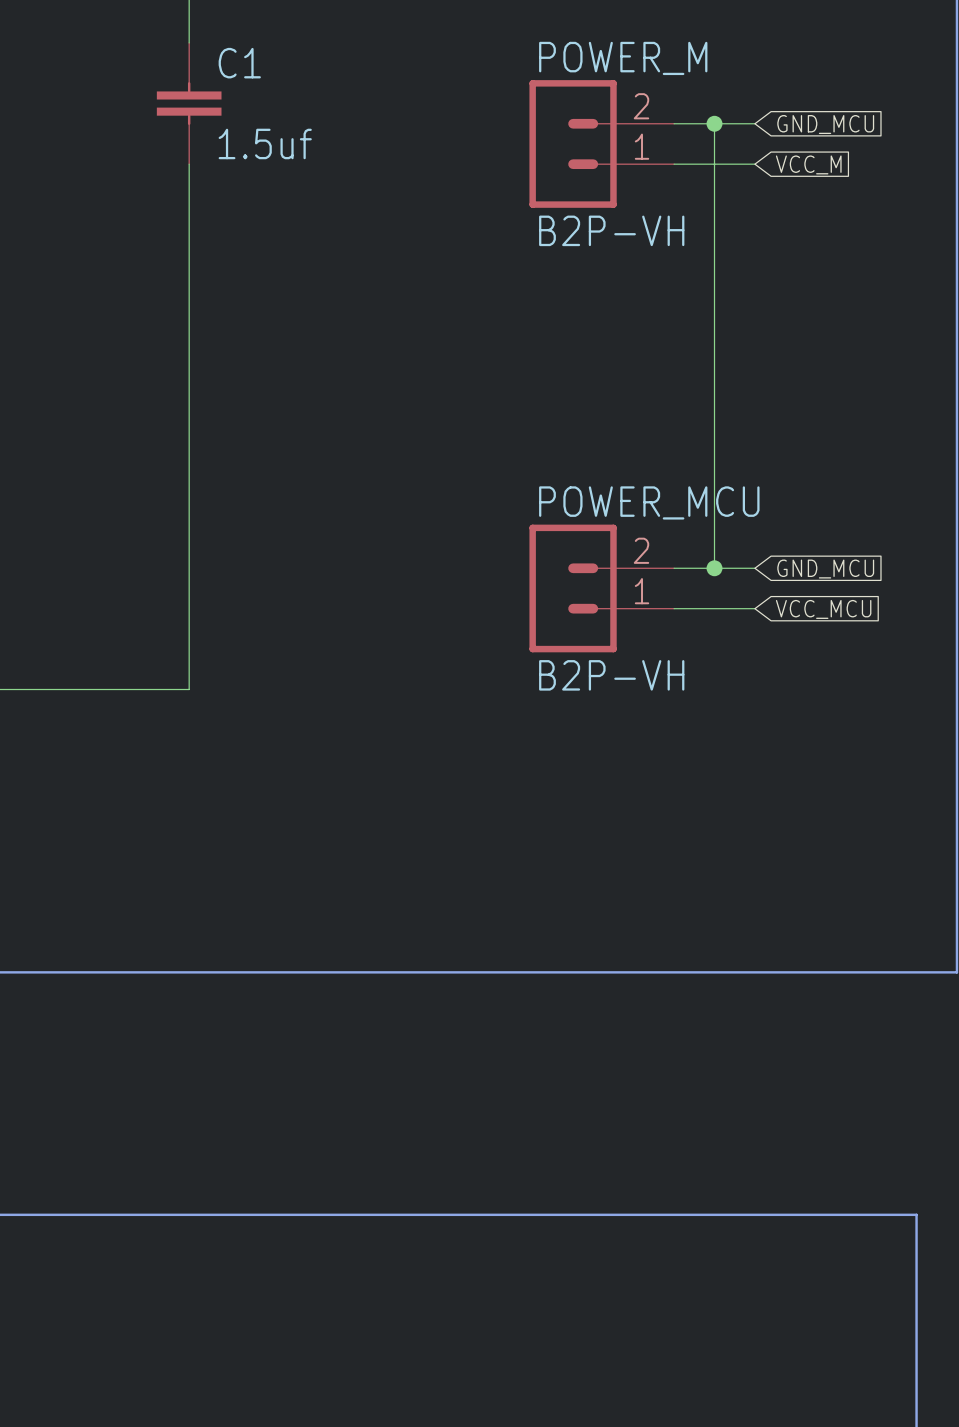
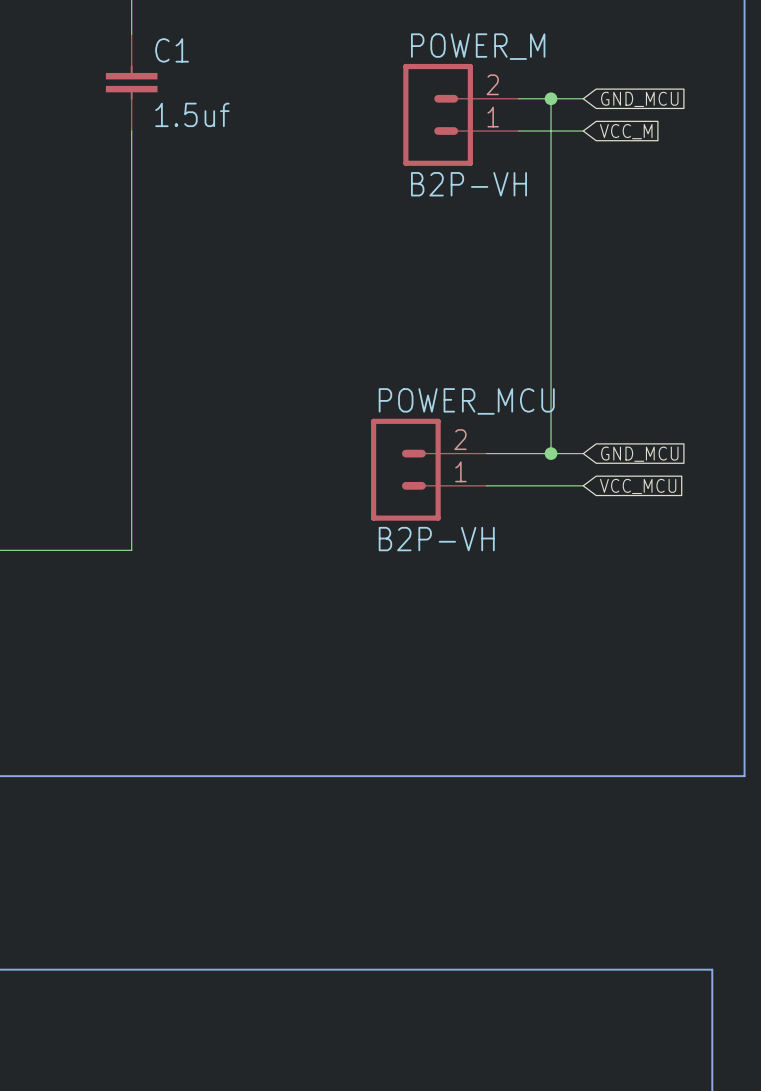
POWER_MCU position: (601, 588) -> (428, 469)

